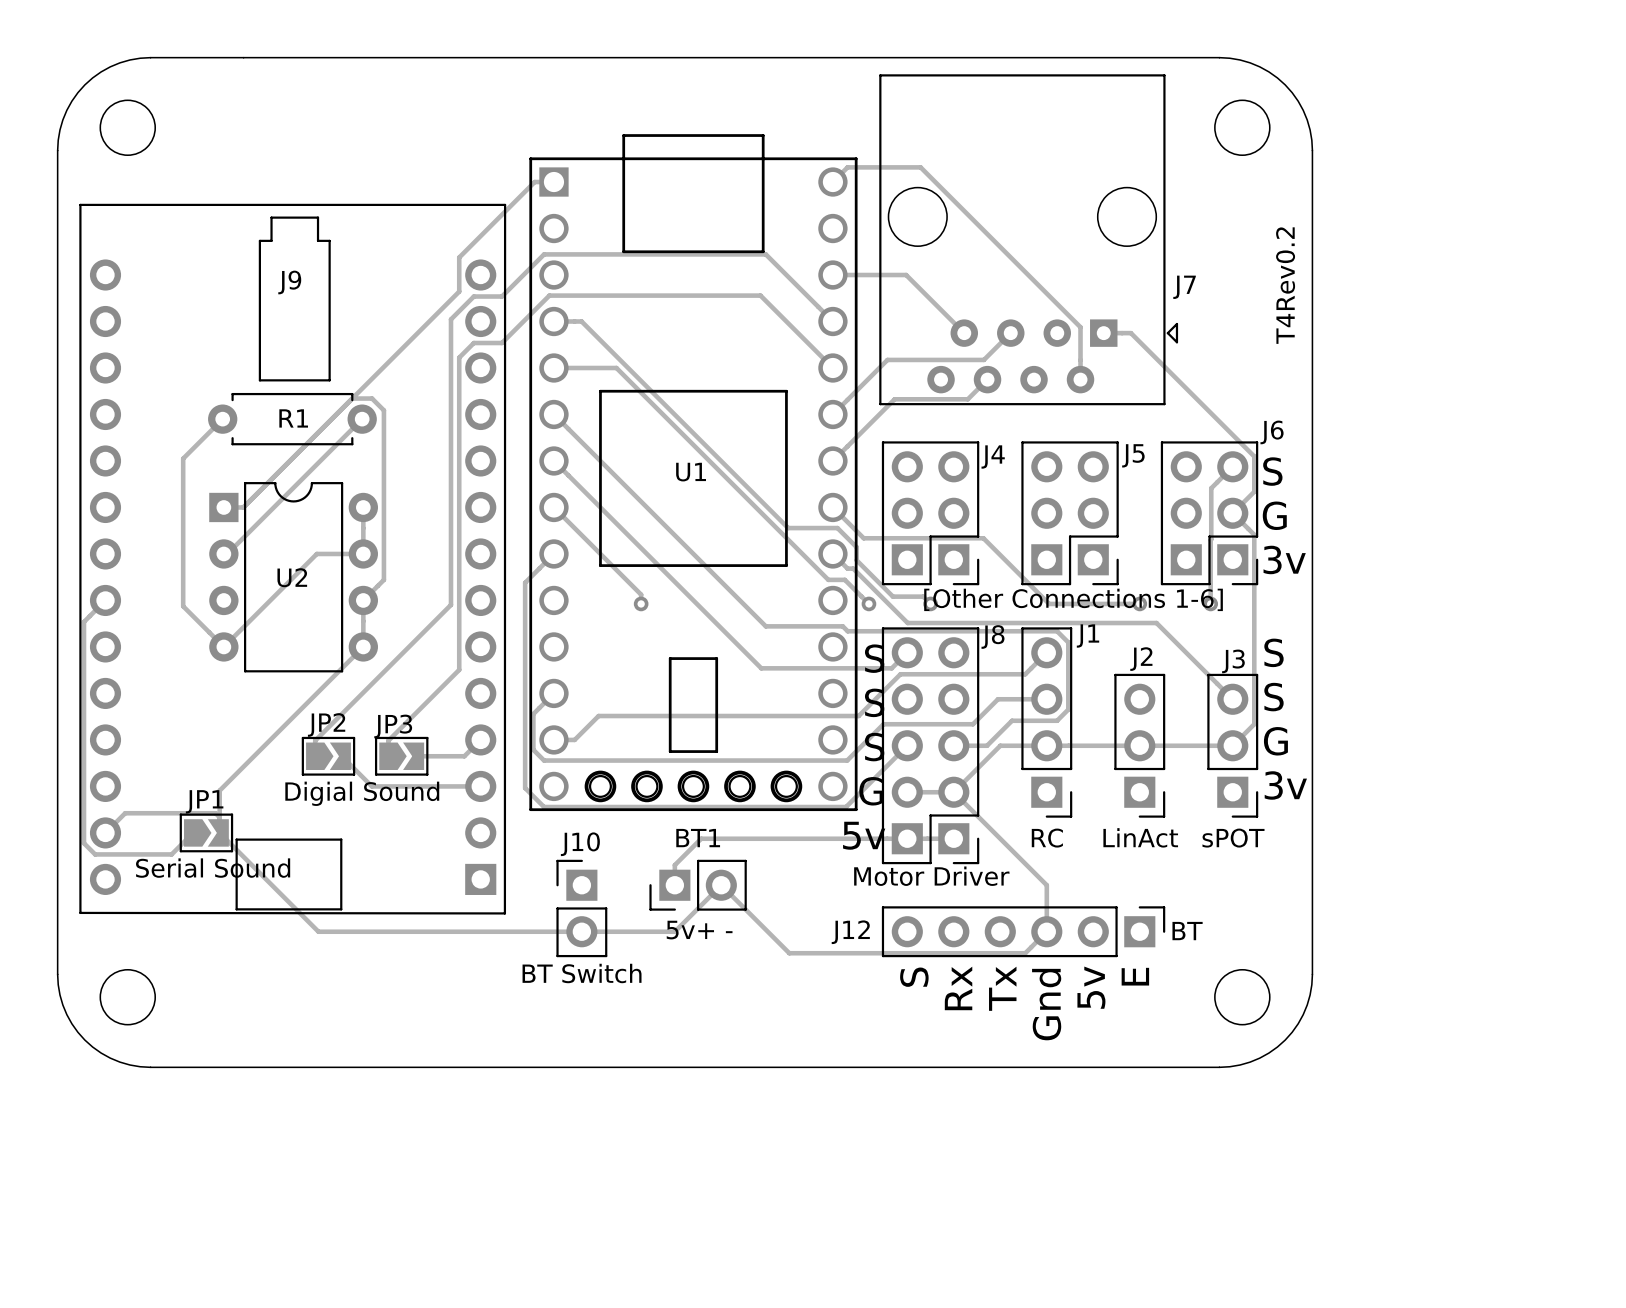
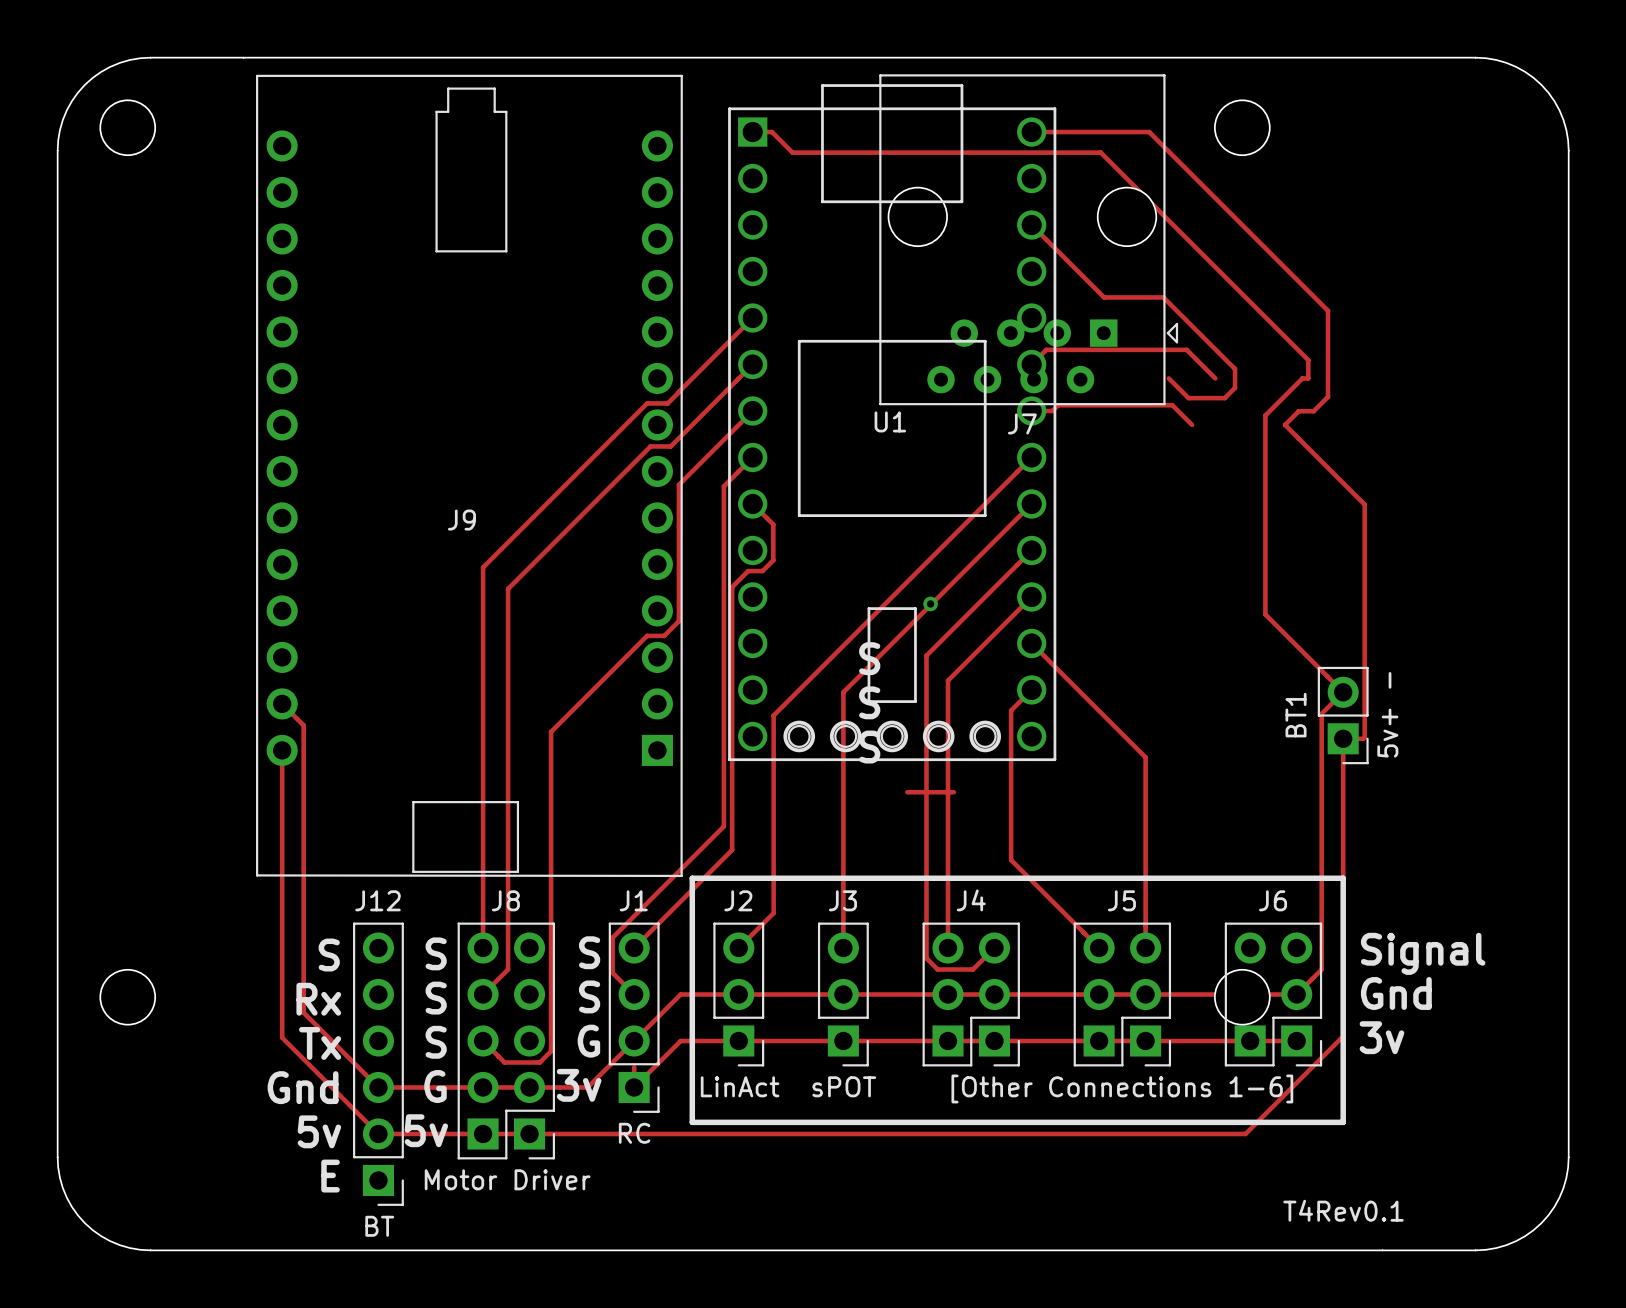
board edge: (1219, 57) (1240, 59) (1259, 66) (1285, 84) (1303, 110) (1311, 140) (1312, 974) (1310, 995) (1303, 1014) (1292, 1032) (1277, 1047) (1250, 1062) (1219, 1067) (140, 1066) (119, 1062) (101, 1053) (77, 1032) (62, 1005) (57, 974) -> (1219, 57) (1475, 57) (1496, 59) (1516, 66) (1541, 84) (1554, 101) (1566, 129) (1568, 150) (1568, 1157) (1566, 1178) (1559, 1197) (1548, 1215) (1533, 1230) (1506, 1245) (1475, 1250) (150, 1250) (129, 1248) (101, 1236) (84, 1223) (71, 1206) (59, 1178) (57, 1157) (57, 974)
track: none -> (752, 132) (771, 132) (792, 152) (1100, 152) (1308, 360) (1308, 378) (1302, 378) (1265, 415) (1265, 614) (1343, 692) (1321, 713) (1321, 969) (1296, 994) (680, 994) (587, 1087) (378, 1087) (303, 1012) (303, 725) (282, 703)
track: none -> (1031, 132) (1149, 132) (1328, 310) (1328, 396) (1313, 411) (1298, 411) (1285, 424) (1364, 504) (1364, 737) (1343, 738) (1343, 1036) (1245, 1133) (378, 1133) (282, 1037) (282, 750)
track: (553, 182) (534, 182) (459, 257) (459, 291) (243, 507) (223, 507) -> none
track: (832, 182) (847, 167) (920, 167) (1080, 327) (1080, 379) -> none
J9 footprint: [79, 203, 507, 915] -> [256, 74, 683, 878]
track: none -> (1031, 225) (1104, 297) (1163, 297) (1235, 369) (1235, 387) (1224, 398) (1188, 398) (1168, 378)
track: (832, 275) (906, 275) (964, 333) -> none
J9 name position: J9 (289, 282) -> J9 (461, 520)
text: T4Rev0.2 (1285, 285) -> none
J7 name position: J7 (1184, 287) -> J7 (1022, 423)
track: none -> (752, 318) (667, 403) (647, 403) (483, 567) (483, 959)
track: (553, 321) (581, 321) (788, 528) (837, 528) (856, 547) (856, 560) (892, 596) (923, 596) (930, 603) -> none
track: (832, 321) (765, 254) (544, 254) (501, 296) (473, 296) (451, 319) (451, 604) (315, 740) (315, 756) -> none
track: (1010, 333) (983, 359) (887, 359) (832, 414) -> none
track: (1103, 333) (1130, 333) (1254, 456) (1254, 491) (1232, 513) (1254, 534) (1254, 724) (1232, 745) (1000, 745) (953, 792) (1046, 885) (1046, 931) (1025, 953) (789, 953) (721, 885) (674, 931) (318, 931) (219, 832) (219, 790) (363, 646) (363, 600) (383, 579) (383, 410) (372, 398) (352, 398) -> none
track: none -> (752, 364) (670, 446) (650, 446) (508, 588) (508, 969) (483, 994)
track: none -> (1031, 364) (1046, 349) (1186, 349) (1215, 378)
track: (553, 367) (616, 367) (828, 579) (844, 579) (868, 603) -> none
track: (832, 367) (760, 295) (549, 295) (501, 343) (473, 343) (459, 357) (459, 669) (388, 740) (388, 756) -> none
track: (987, 379) (967, 399) (894, 399) (832, 460) -> none
track: none -> (752, 411) (678, 484) (678, 621) (664, 635) (647, 635) (551, 731) (551, 1051) (539, 1062) (504, 1062) (483, 1040)
track: none -> (1031, 411) (1052, 411) (1058, 405) (1172, 405) (1192, 424)
track: (553, 414) (765, 626) (842, 626) (847, 631) (1057, 631) (1068, 642) (1068, 709) (1057, 720) (1012, 720) (987, 745) (953, 745) -> none
track: (222, 419) (183, 458) (183, 606) (223, 646) (316, 553) (363, 553) (363, 507) -> none
R1: (292, 419) -> none
track: (362, 419) (227, 553) (223, 553) -> none
J6 name position: J6 (1272, 432) -> J6 (1273, 900)
J5 name position: J5 (1133, 455) -> J5 (1121, 900)
track: none -> (752, 457) (723, 486) (723, 826) (612, 937) (612, 972) (634, 994)
J4 name position: J4 (993, 457) -> J4 (971, 900)
track: none -> (1031, 457) (773, 715) (773, 913) (738, 948)
track: (553, 460) (761, 668) (891, 668) (907, 652) -> none
track: (1232, 466) (1211, 488) (1210, 603) -> none
text: S (1272, 471) -> none
U1 position: (693, 472) -> (892, 422)
track: none -> (752, 503) (773, 524) (773, 560) (762, 571) (748, 571) (732, 587) (732, 850) (634, 948)
track: none -> (1031, 503) (843, 692) (843, 948)
track: (832, 507) (863, 538) (983, 538) (1049, 603) (1139, 603) -> none
J4 position: (930, 513) -> (971, 994)
J5 position: (1070, 513) -> (1122, 994)
J6 position: (1209, 513) -> (1273, 994)
text: G (1274, 515) -> none
track: (553, 516) (553, 507) (641, 594) (641, 603) -> none
track: none -> (1031, 550) (926, 655) (926, 958) (937, 969) (972, 969) (994, 948)
track: (553, 553) (525, 582) (525, 788) (544, 807) (846, 807) (907, 745) -> none
track: (832, 553) (847, 568) (853, 568) (907, 623) (1156, 623) (1232, 699) -> none
text: 3v (1284, 559) -> none
U2: (293, 577) -> none
track: none -> (1031, 596) (948, 680) (948, 948)
J5 value position: [Other Connections 1-6] (1073, 599) -> [Other Connections 1-6] (1122, 1088)
track: (105, 600) (83, 621) (83, 843) (95, 854) (171, 854) (193, 832) -> none
via: (641, 603) -> none
via: (868, 603) -> none
via: (1139, 603) -> none
via: (1210, 603) -> none
J1 name position: J1 (1088, 636) -> J1 (633, 900)
J8 name position: J8 (992, 637) -> J8 (505, 900)
track: none -> (1031, 643) (1145, 757) (1145, 948)
track: (1046, 652) (1025, 674) (900, 674) (858, 716) (598, 716) (574, 739) (553, 739) -> none
text: S (1273, 652) -> none
J2 name position: J2 (1141, 659) -> J2 (738, 900)
J3 name position: J3 (1233, 661) -> J3 (842, 900)
track: none -> (1031, 689) (1011, 710) (1011, 859) (1099, 948)
track: (553, 693) (533, 714) (533, 749) (544, 760) (847, 760) (883, 724) (973, 724) (997, 699) (1046, 699) -> none
text: S (1273, 697) -> none
J1 position: (1046, 722) -> (634, 1017)
track: (480, 739) (464, 756) (414, 756) -> none
text: G (1275, 741) -> none
J8 position: (930, 745) -> (506, 1040)
J2 position: (1139, 745) -> (738, 994)
J3 position: (1232, 745) -> (843, 994)
JP2: (328, 756) -> none
track: (341, 756) (371, 786) (480, 786) -> none
JP3: Digial Sound (401, 756) -> none
text: 3v (1285, 785) -> none
text: G (871, 791) -> none
track: (219, 817) (215, 813) (125, 813) (105, 832) -> none
JP1: Serial Sound (206, 832) -> none
text: 5v (864, 835) -> none
track: (953, 838) (701, 838) (674, 865) (674, 885) -> none
J8 value position: Motor Driver (931, 876) -> Motor Driver (507, 1179)
line: none -> (692, 878) (1343, 878) (1343, 1122) (692, 1122) (692, 878)
BT1 rotation: 0° (698, 885) -> 90° counterclockwise (1343, 715)
BT1 position: (698, 885) -> (1343, 715)
J10: BT Switch (581, 908) -> none
J12 rotation: 0° (1023, 931) -> 90° clockwise (378, 1064)
J12 position: (1023, 931) -> (378, 1064)
text: none -> S (589, 952)
text: none -> Signal (1423, 953)
text: none -> S (436, 953)
text: none -> S (329, 955)
text: E (1135, 976) -> none
text: S (914, 977) -> none
text: 5v (1091, 987) -> none
text: Rx (958, 988) -> none
text: Tx (1002, 988) -> none
text: none -> S (589, 996)
text: none -> S (436, 998)
text: none -> Rx (318, 999)
text rotation: 0° (1046, 1004) -> 90° clockwise (1396, 993)
text position: Gnd (1046, 1004) -> Gnd (1396, 993)
text: none -> 3v (1381, 1037)
track: none -> (1296, 1040) (680, 1040) (634, 1087) (634, 1067)
text: none -> G (588, 1041)
text: none -> S (436, 1042)
text: none -> Tx (320, 1043)
text: none -> 3v (579, 1085)
text: none -> G (435, 1086)
text: none -> Gnd (303, 1087)
text: none -> 5v (426, 1130)
text: none -> 5v (319, 1131)
text: none -> E (330, 1176)
text: none -> T4Rev0.1 (1343, 1210)

